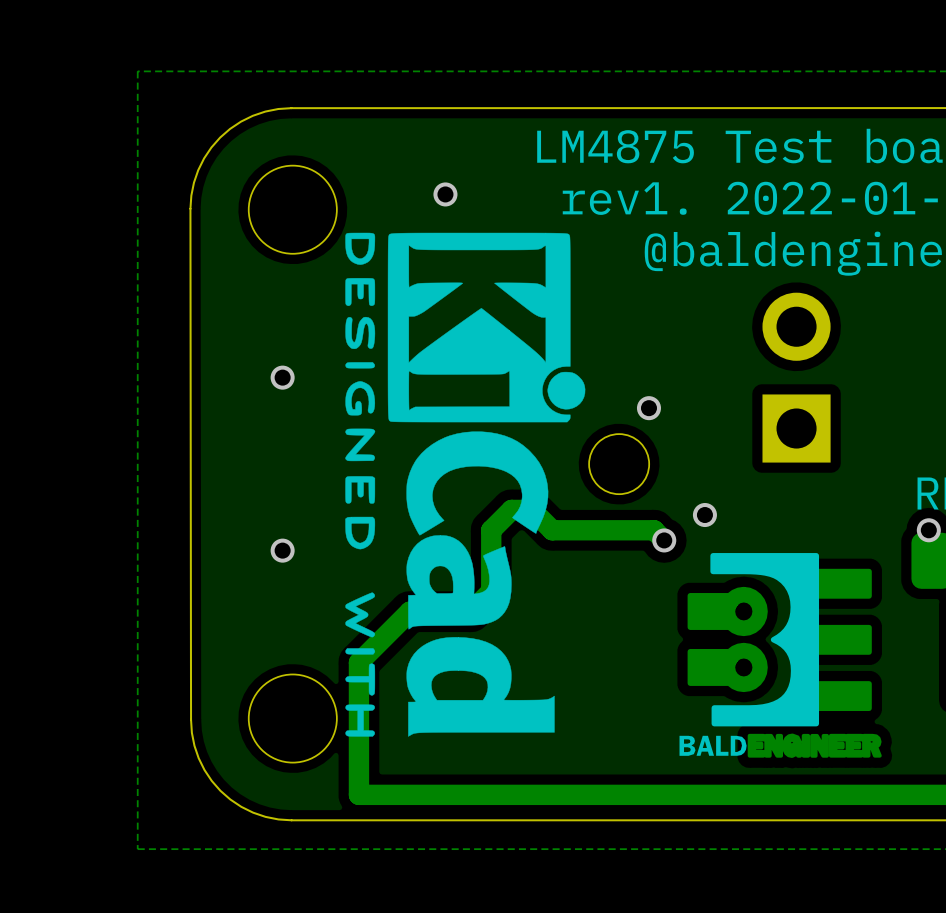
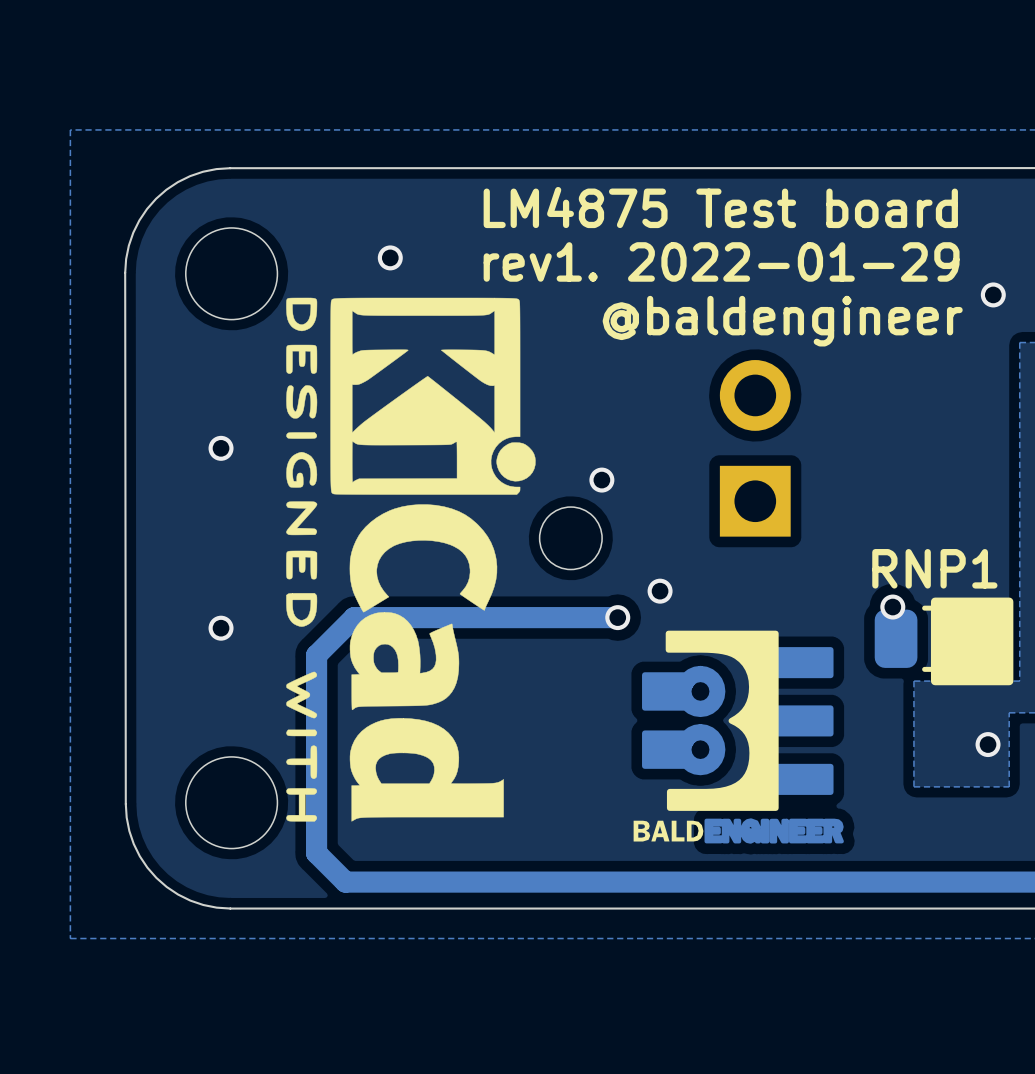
track: (664, 540) (654, 530) (552, 530) (531, 509) (511, 509) (491, 530) (491, 591) (470, 611) (409, 611) (358, 662) (358, 794) (402, 794) -> (617, 617) (354, 617) (316, 655) (316, 853) (345, 882)

